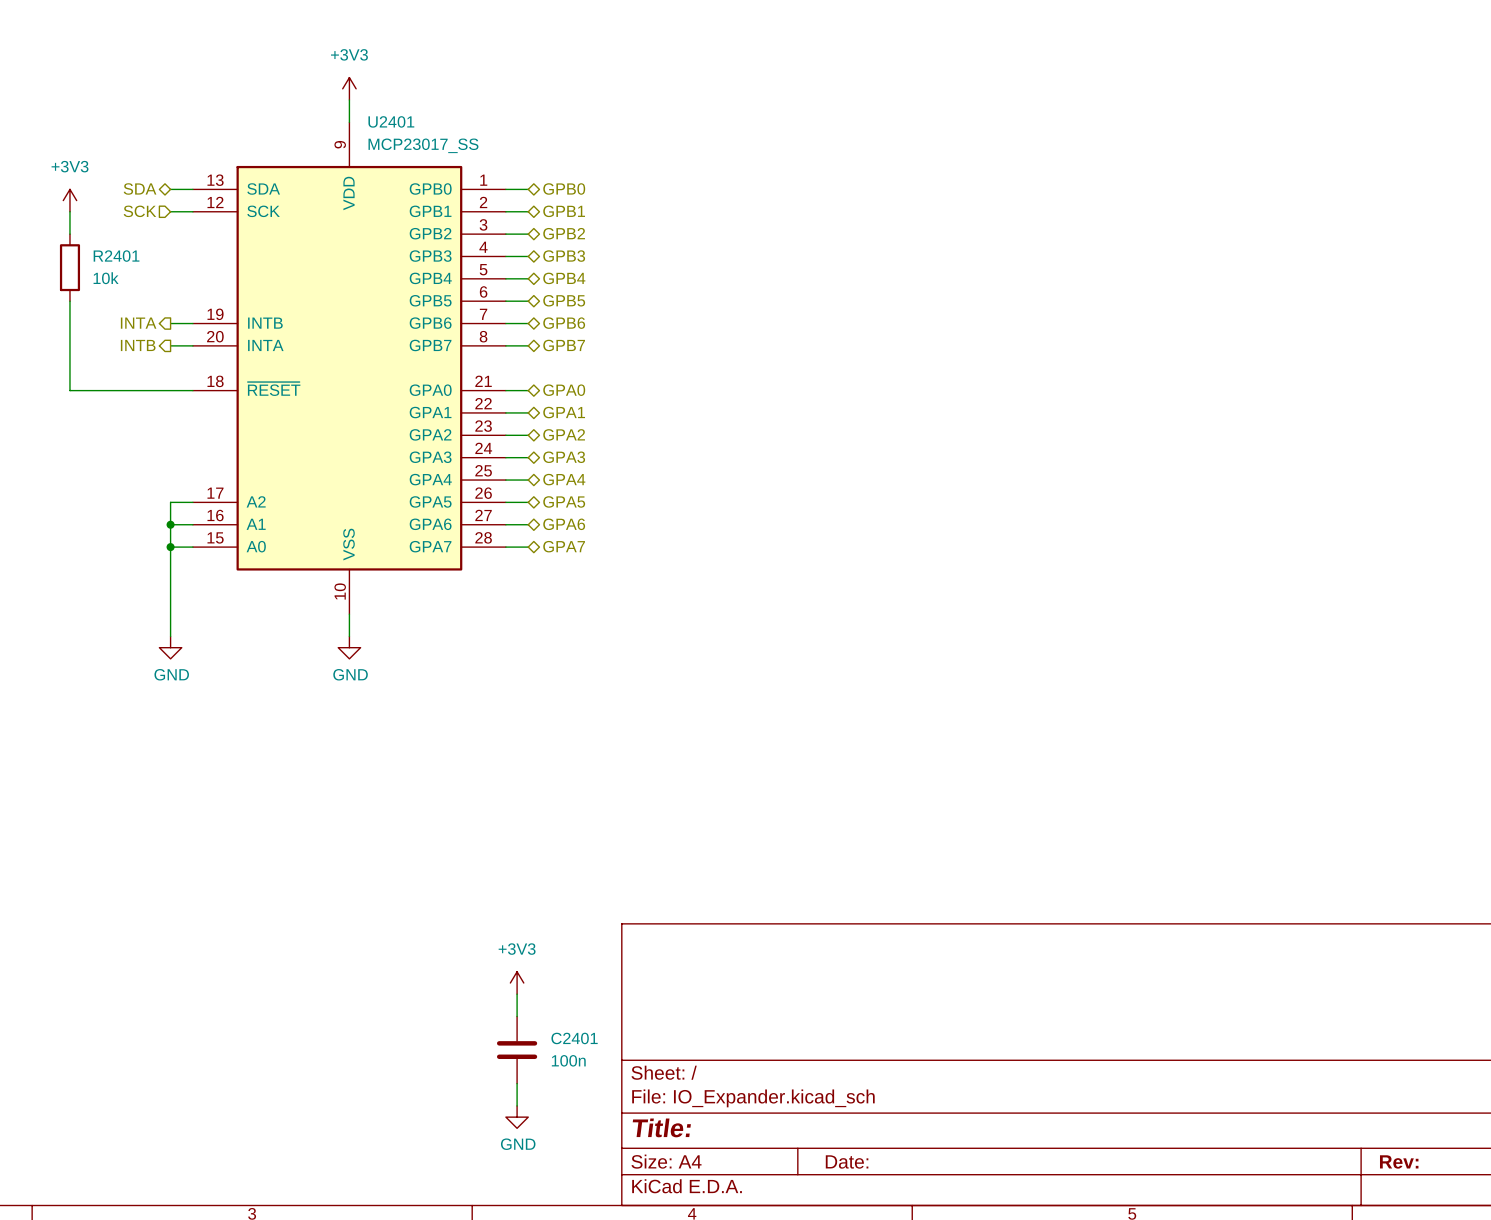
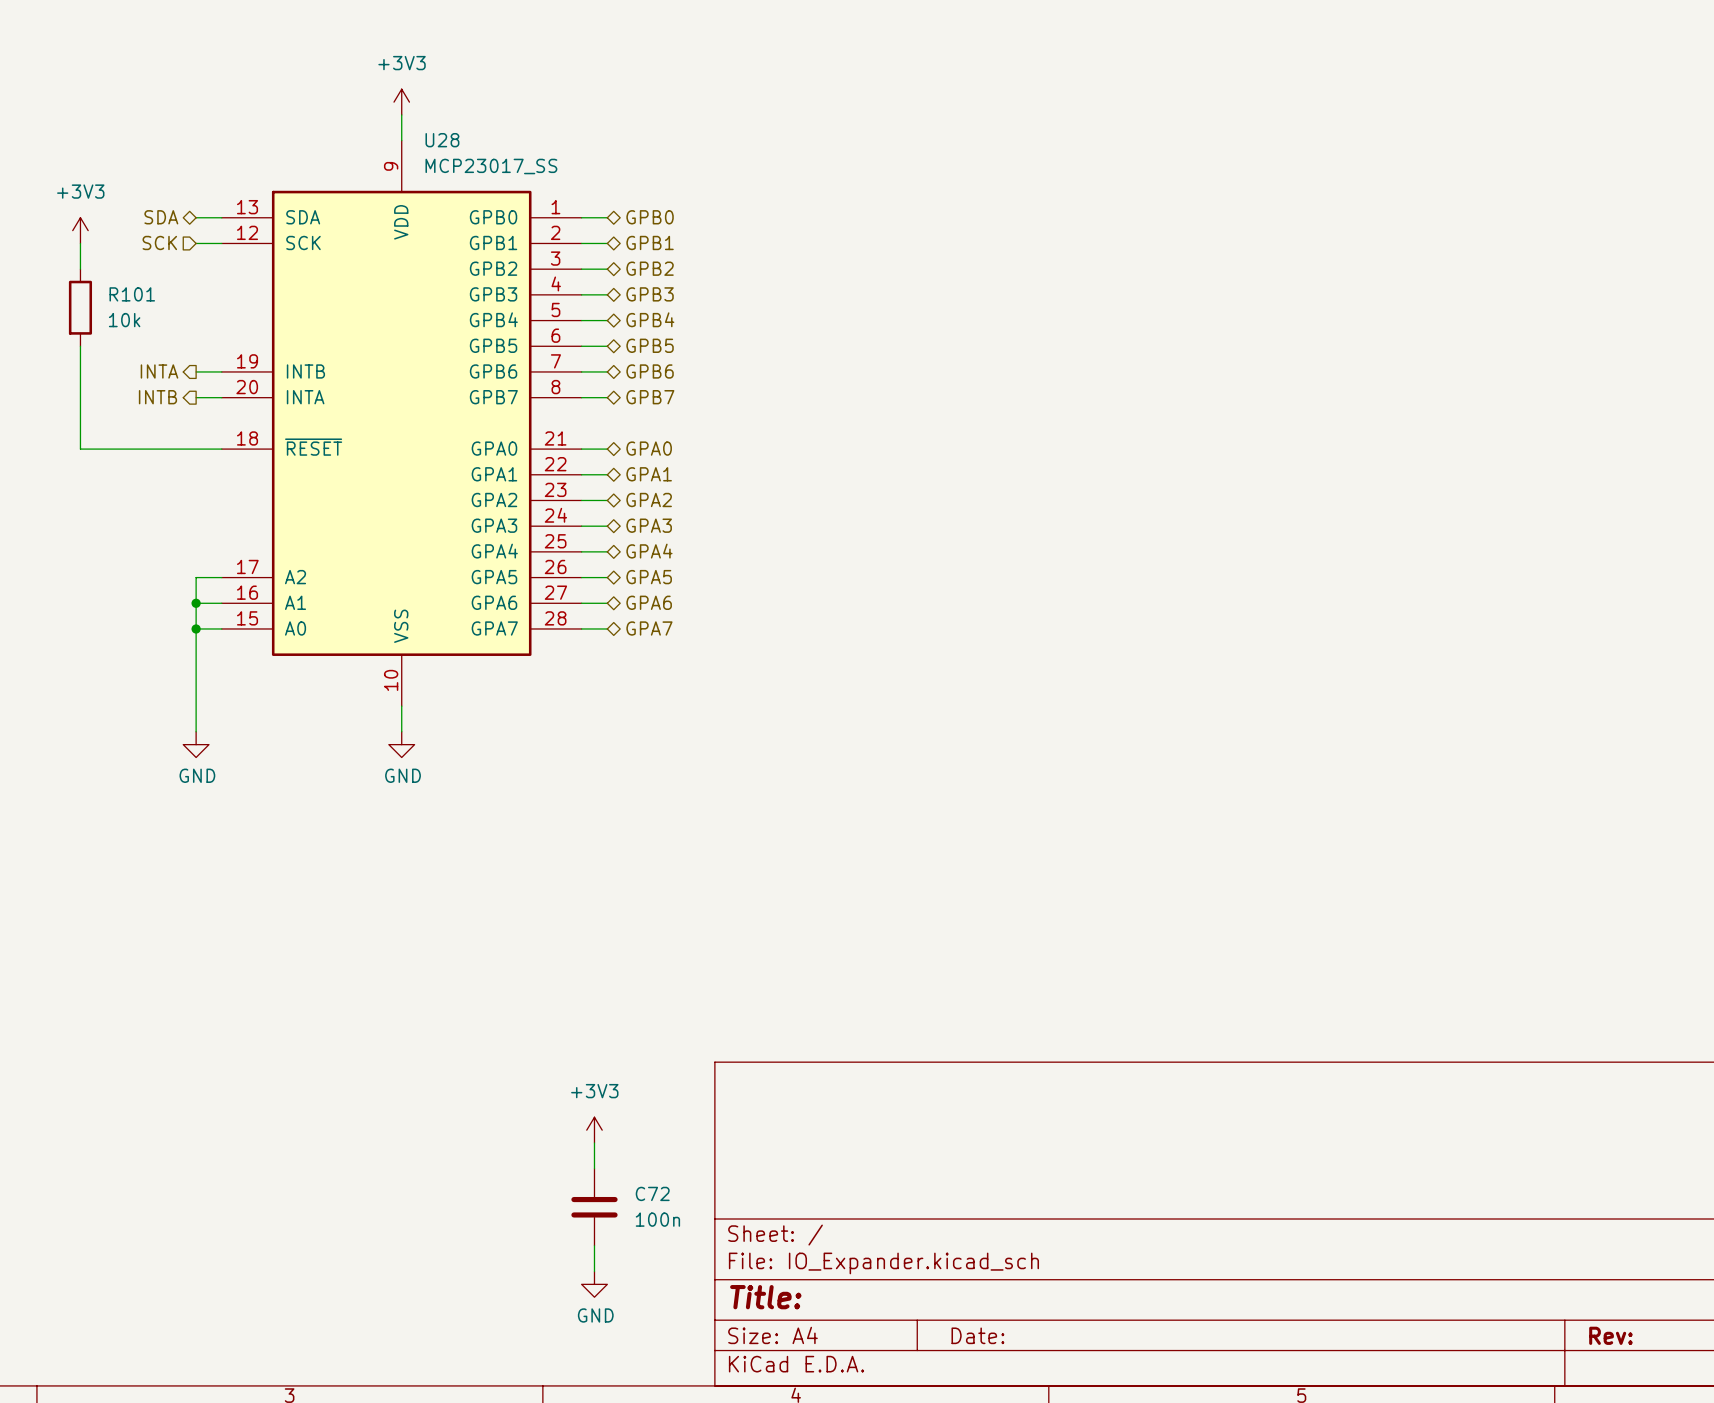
U2401 name: U2401 (391, 121) -> U28 (442, 140)
R2401 name: R2401 (116, 256) -> R101 (132, 294)
C2401 name: C2401 (574, 1038) -> C72 (652, 1193)

